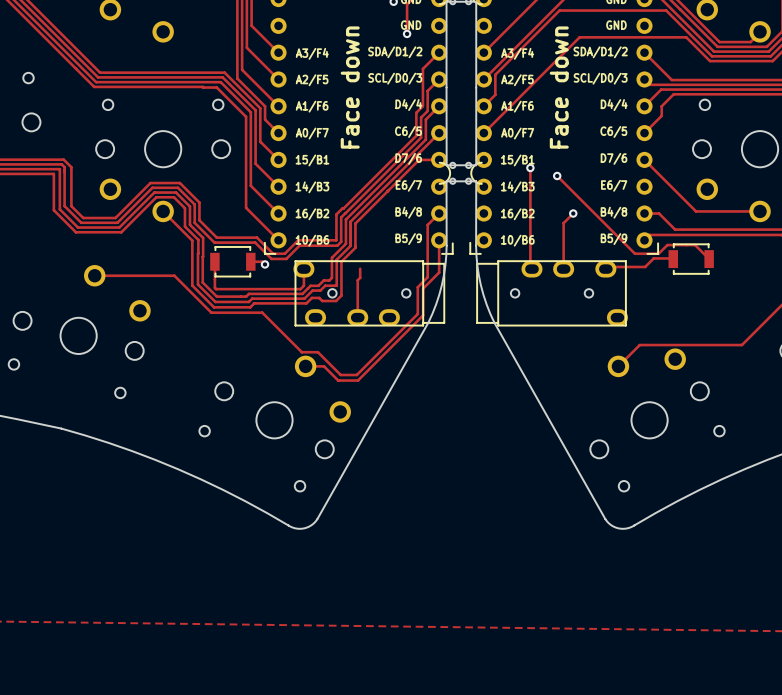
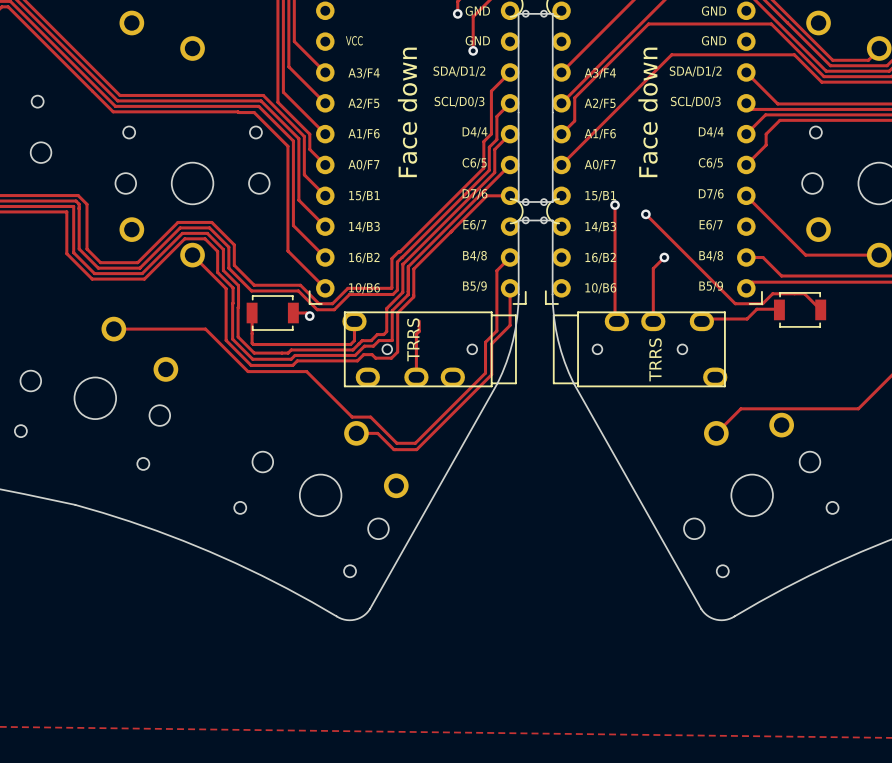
drawing: none -> [345, 36, 363, 46]
part text: none -> TRRS (413, 339)
part text: none -> TRRS (655, 359)

